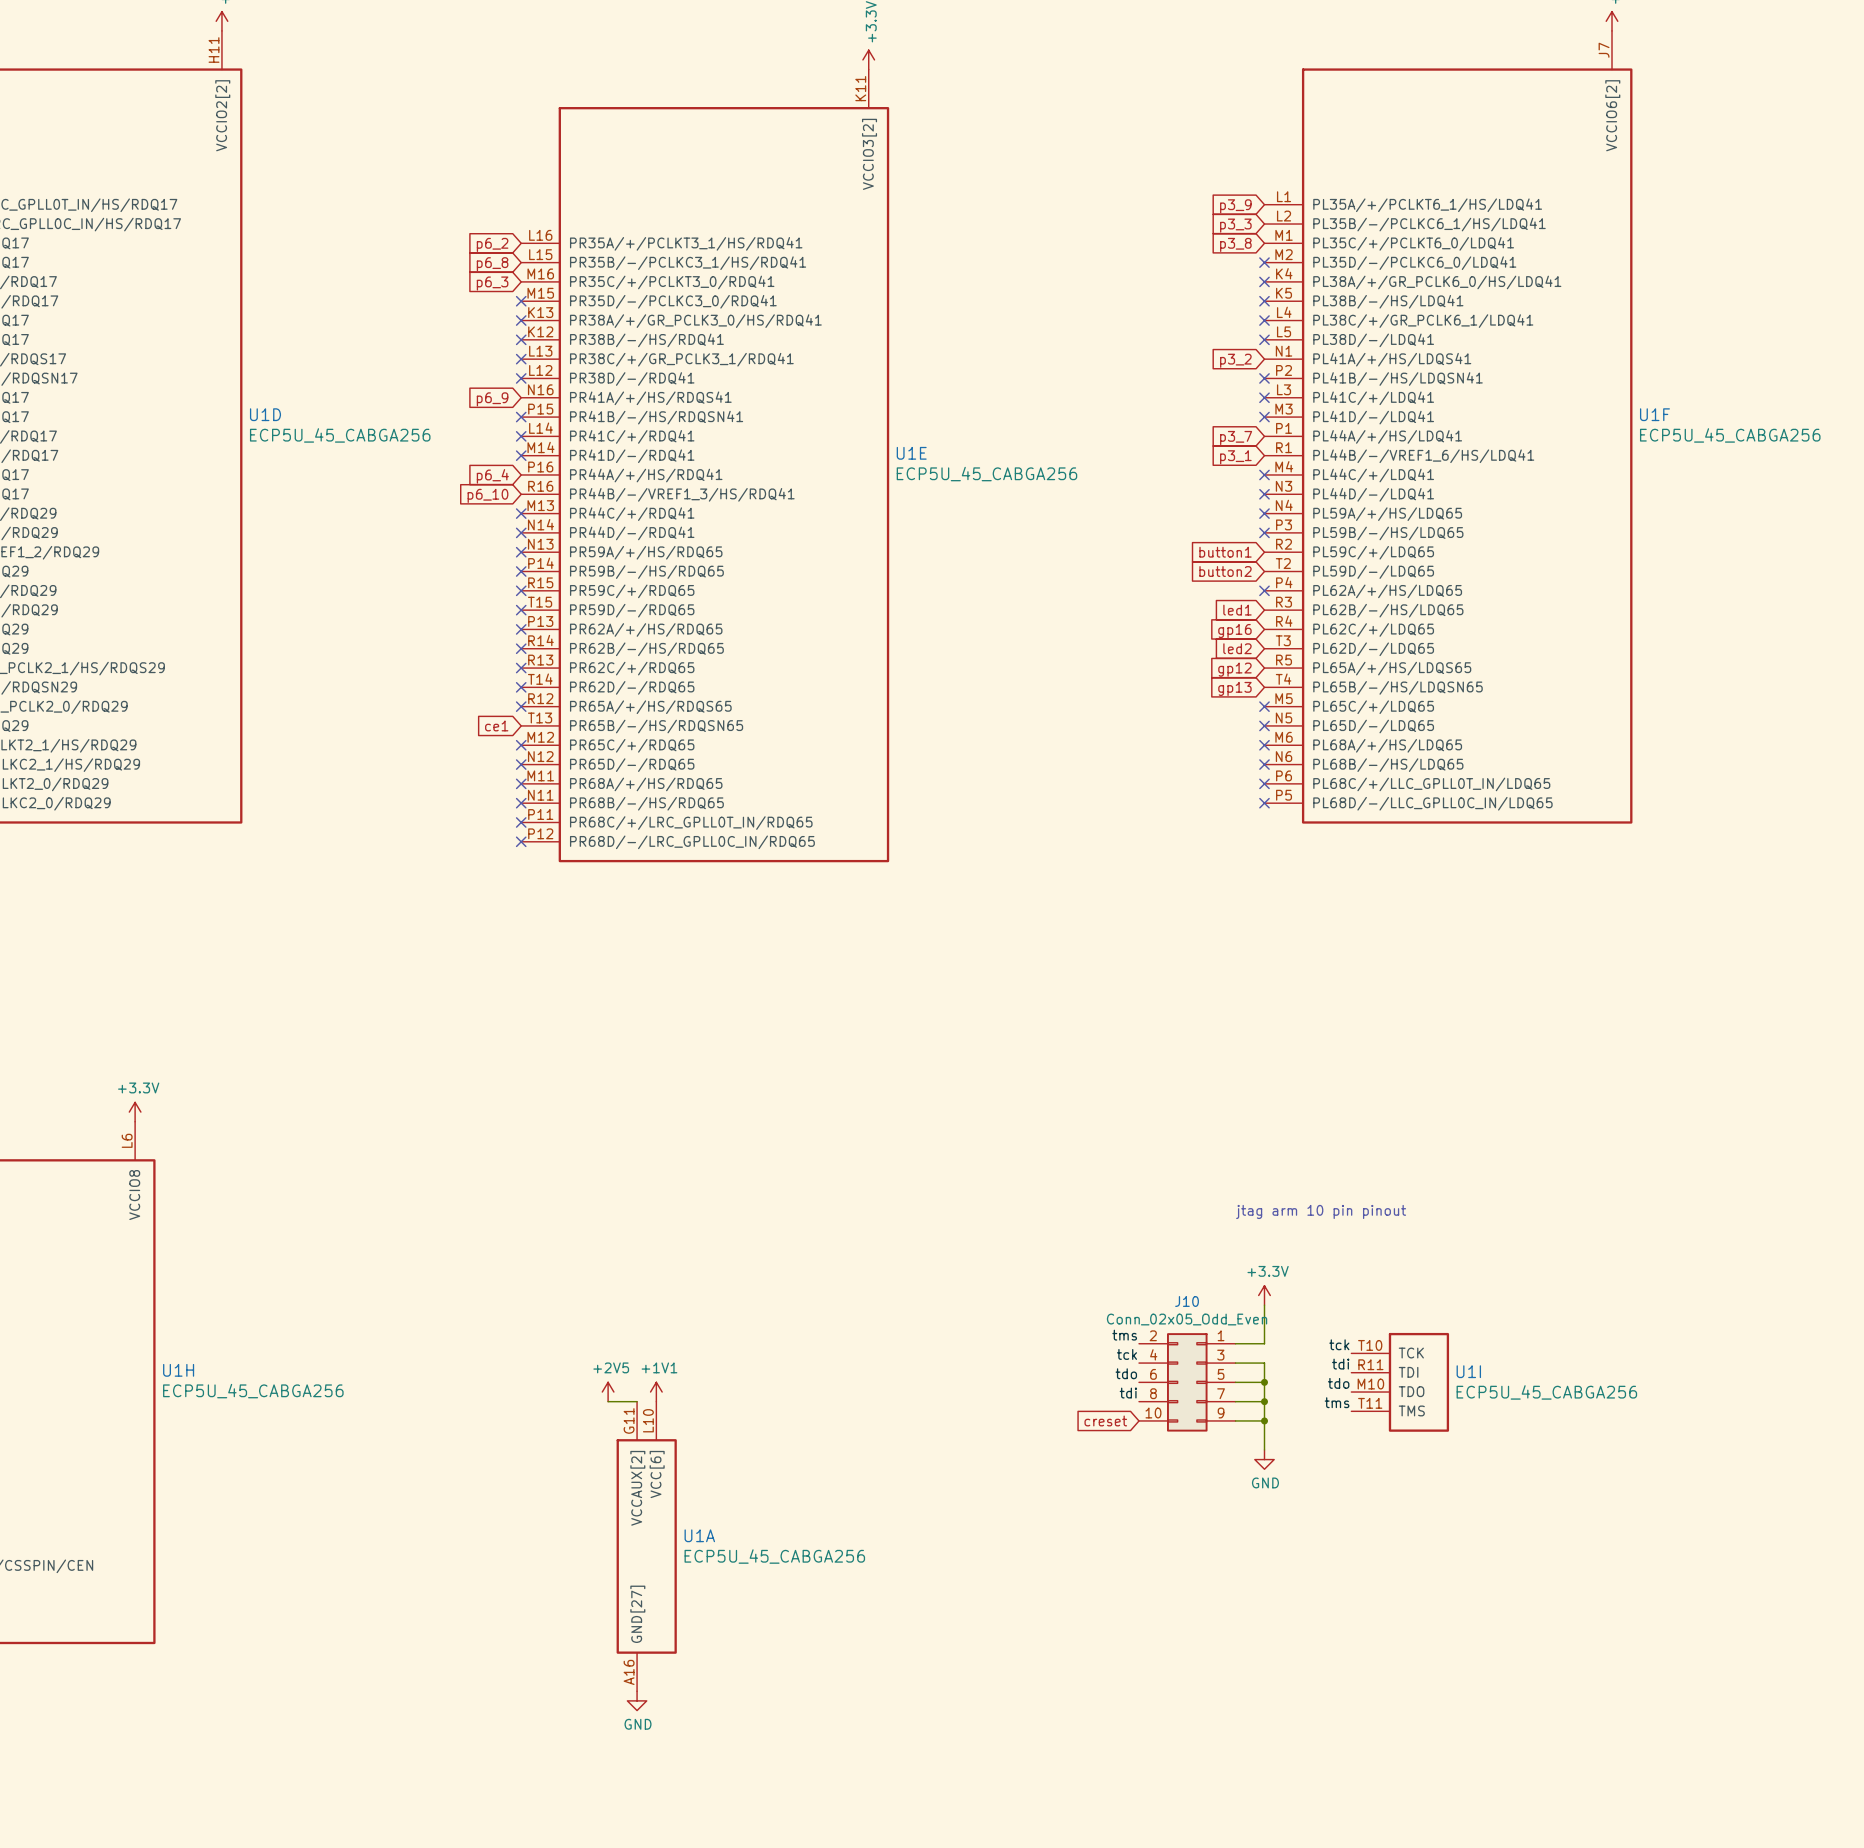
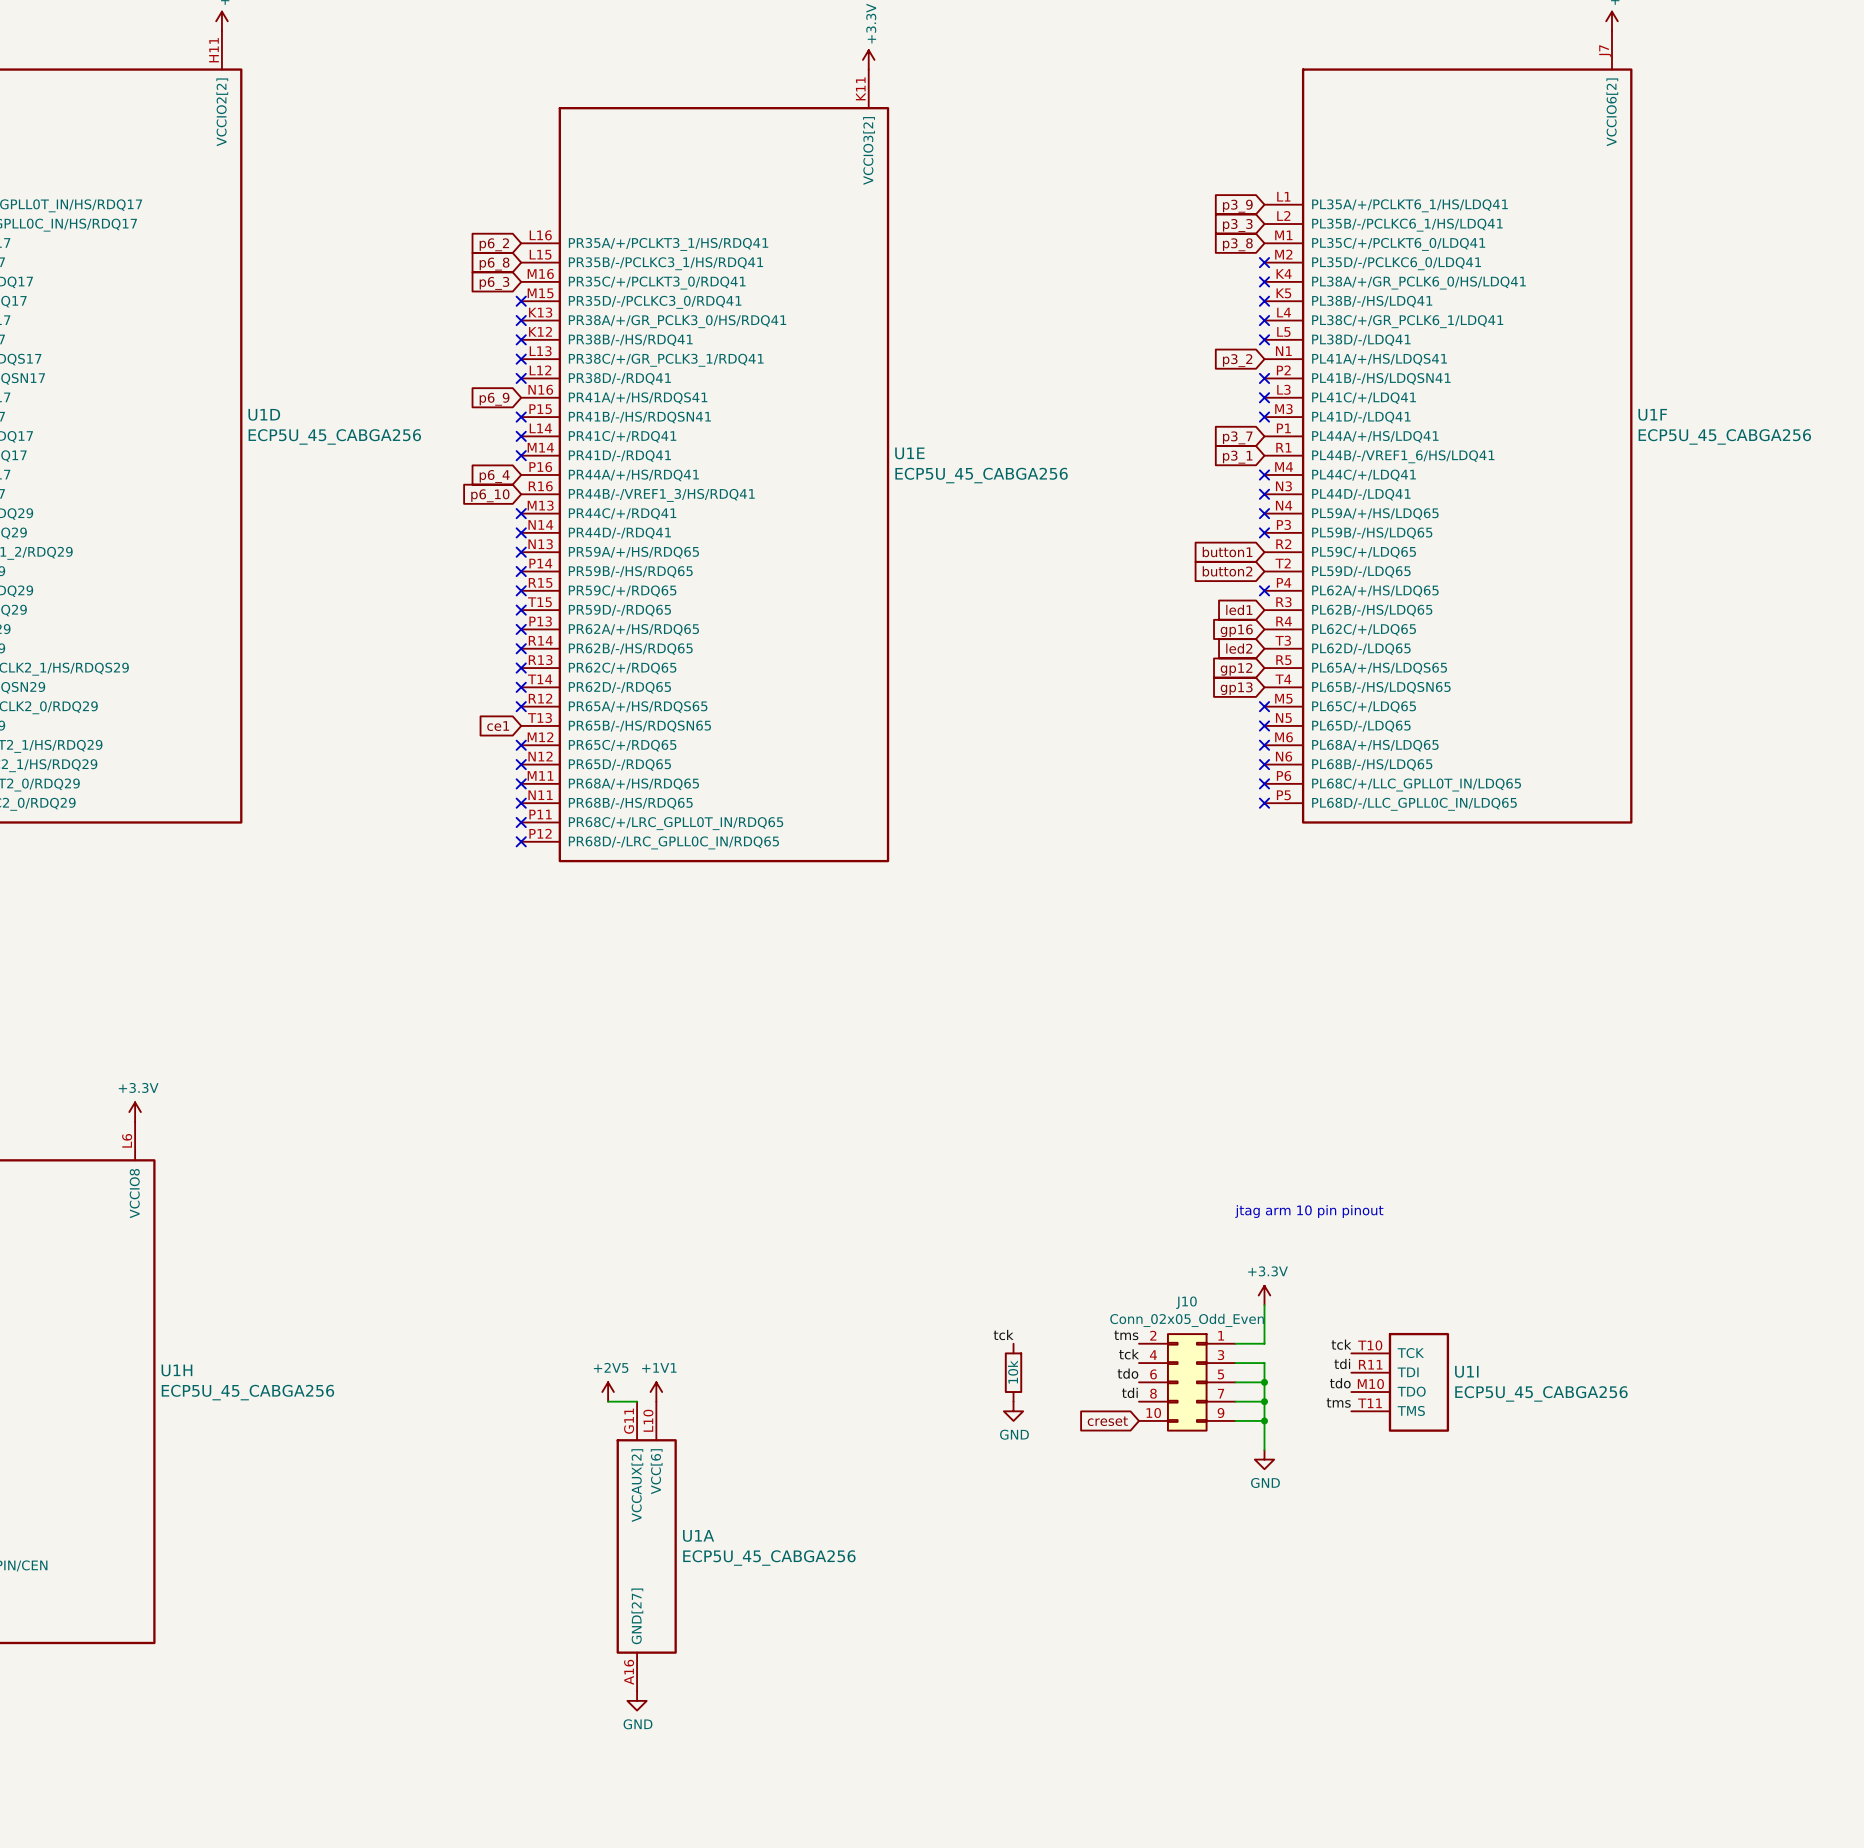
label: none -> tck (1003, 1335)
part: none -> 10k (1013, 1372)
power symbol: none -> GND (1013, 1411)

